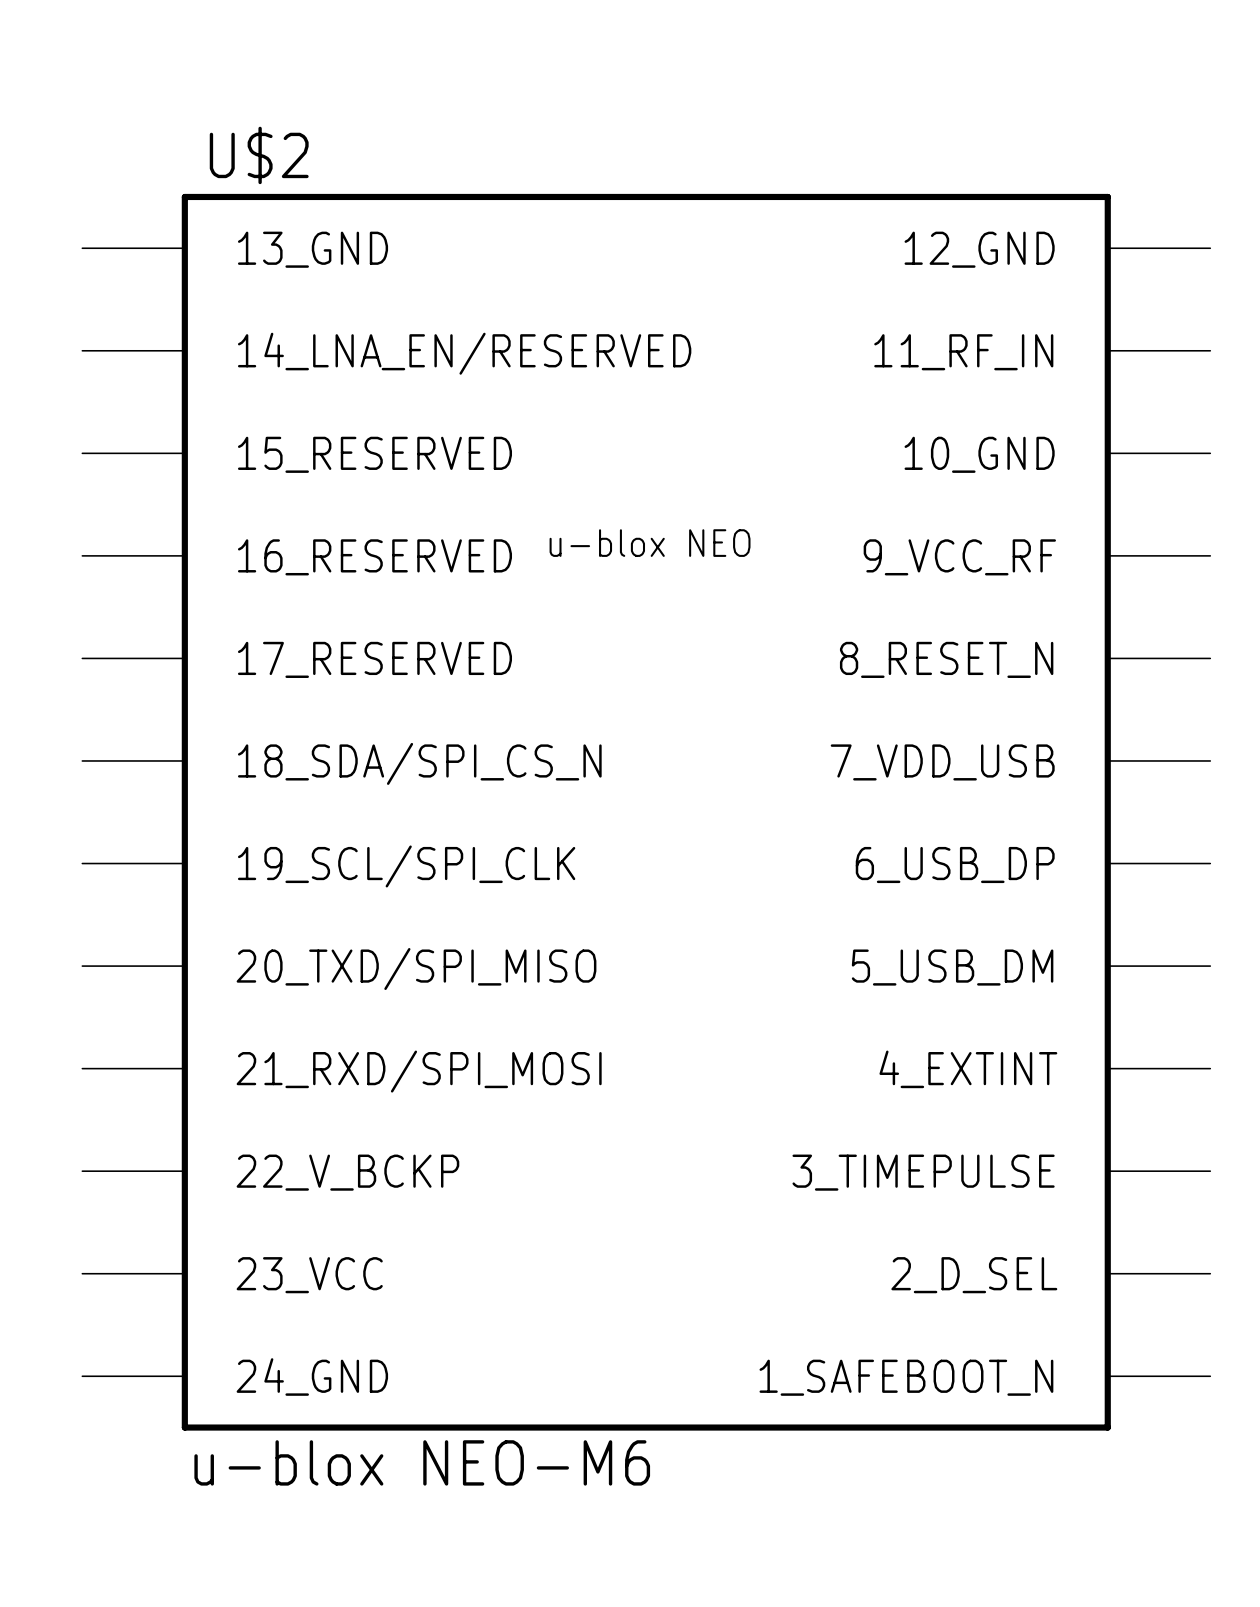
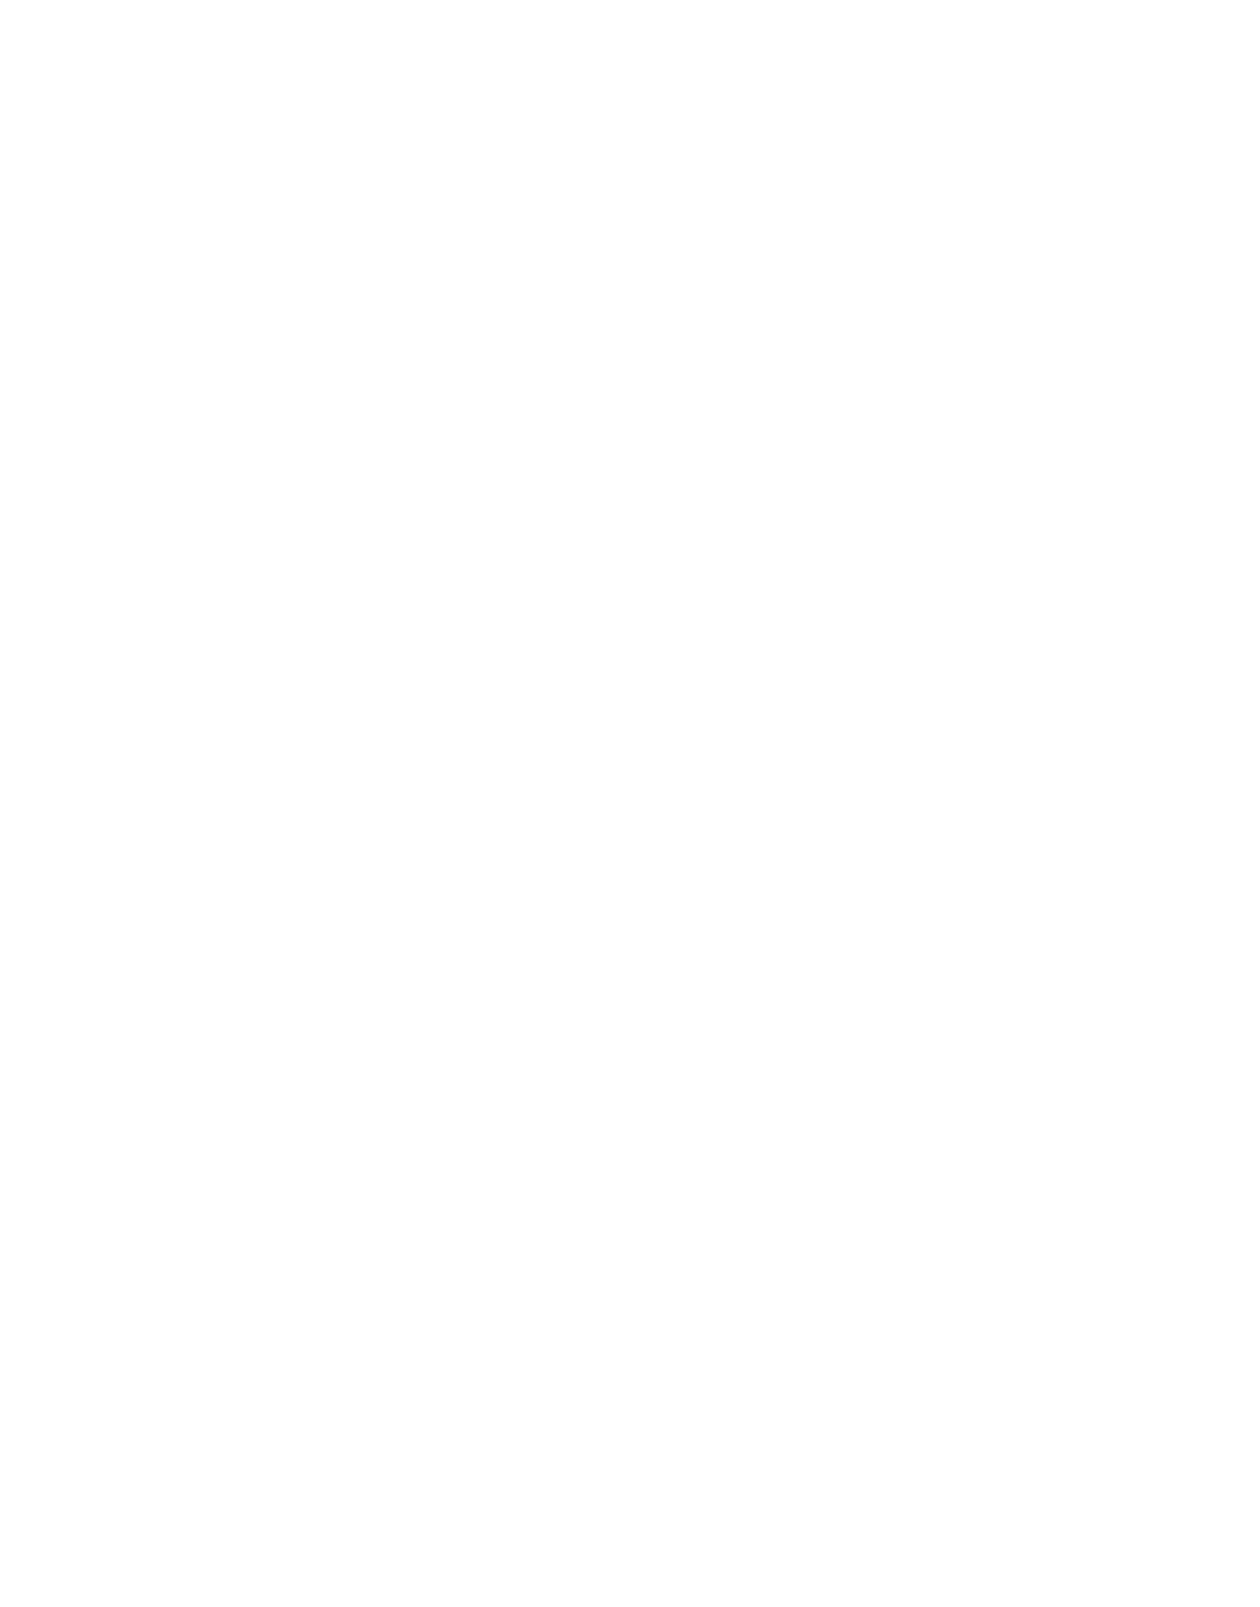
U$2: u-blox NEO-M6 (646, 812) -> none

